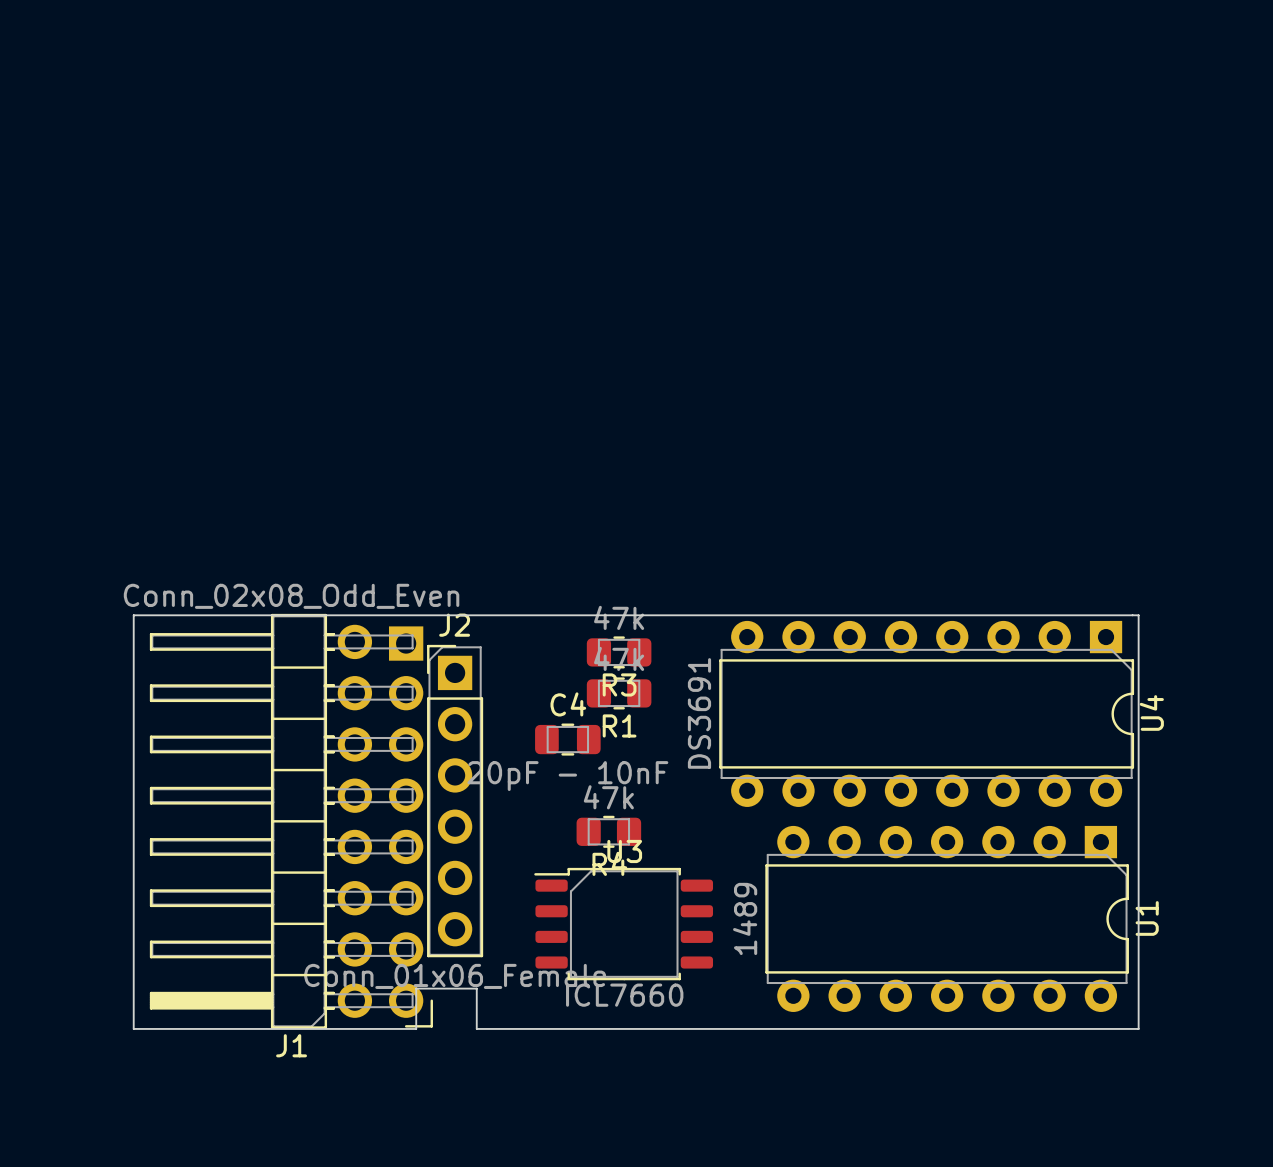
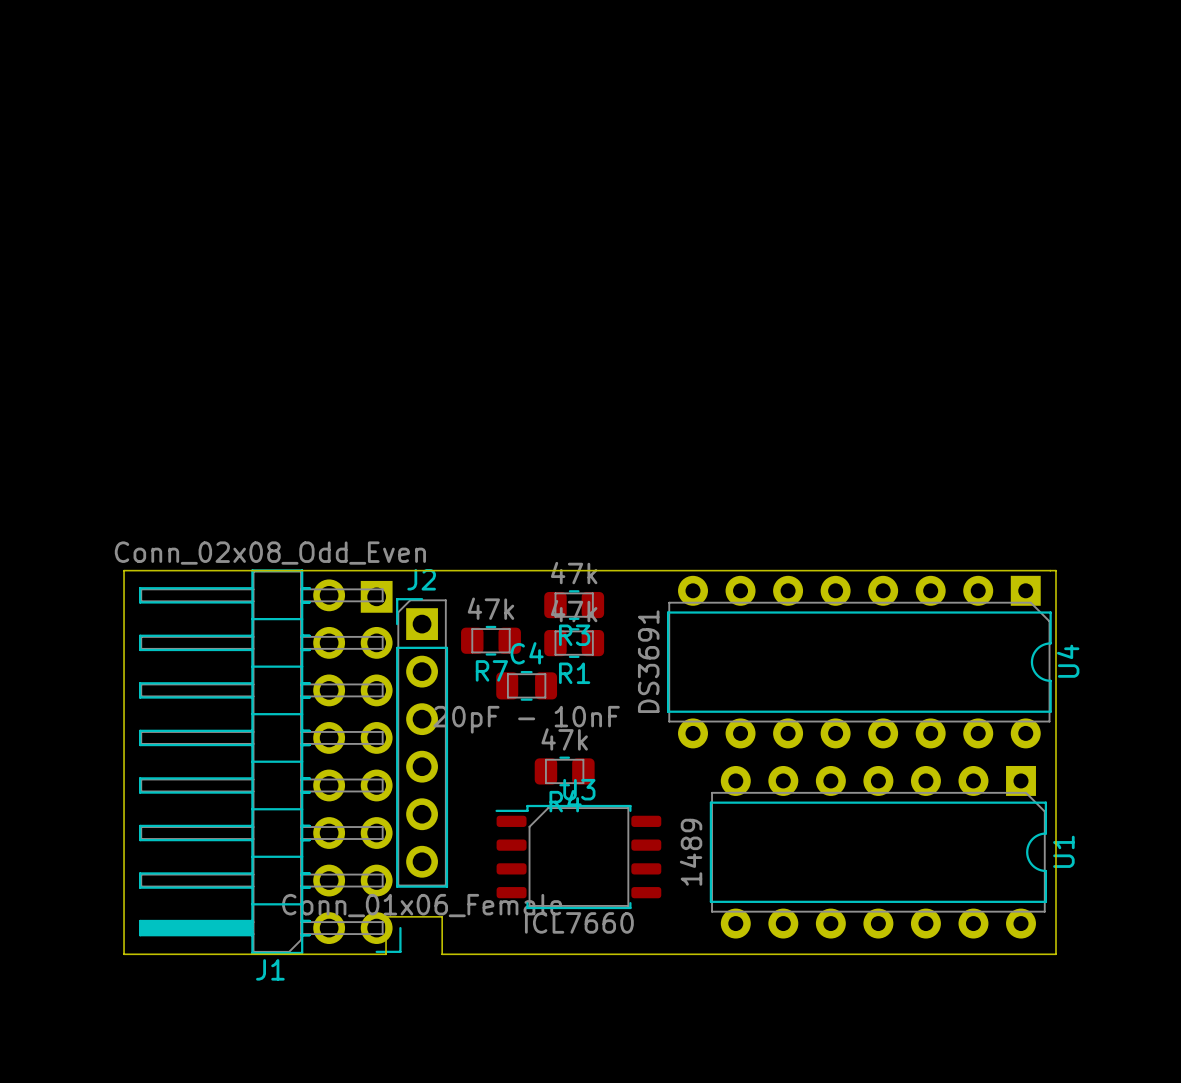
R7: none -> 47k (490, 640)

